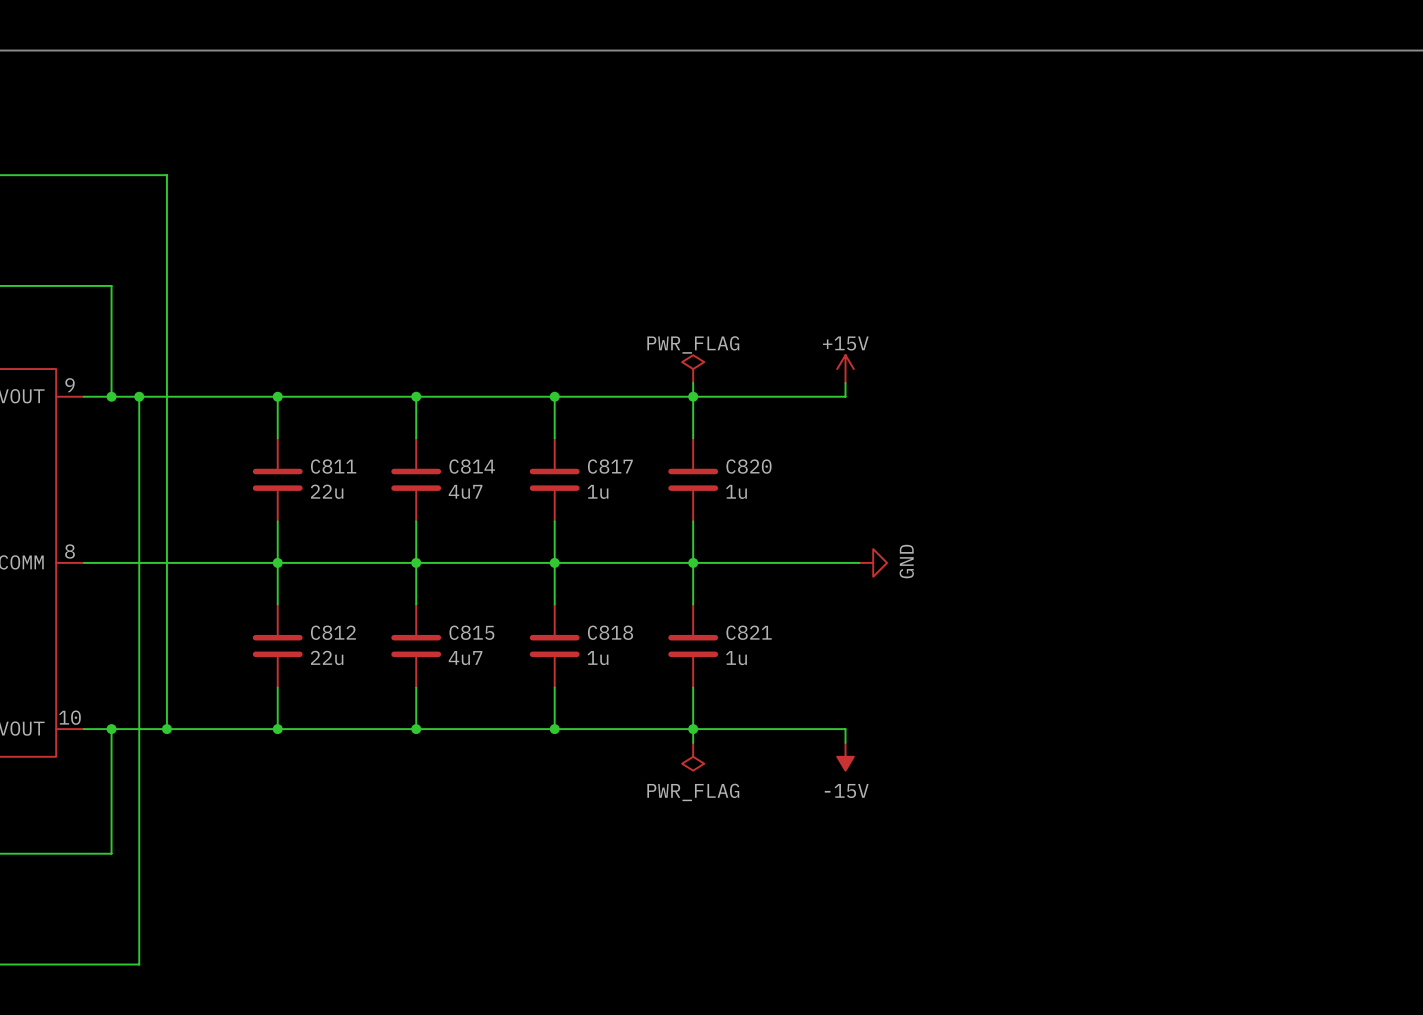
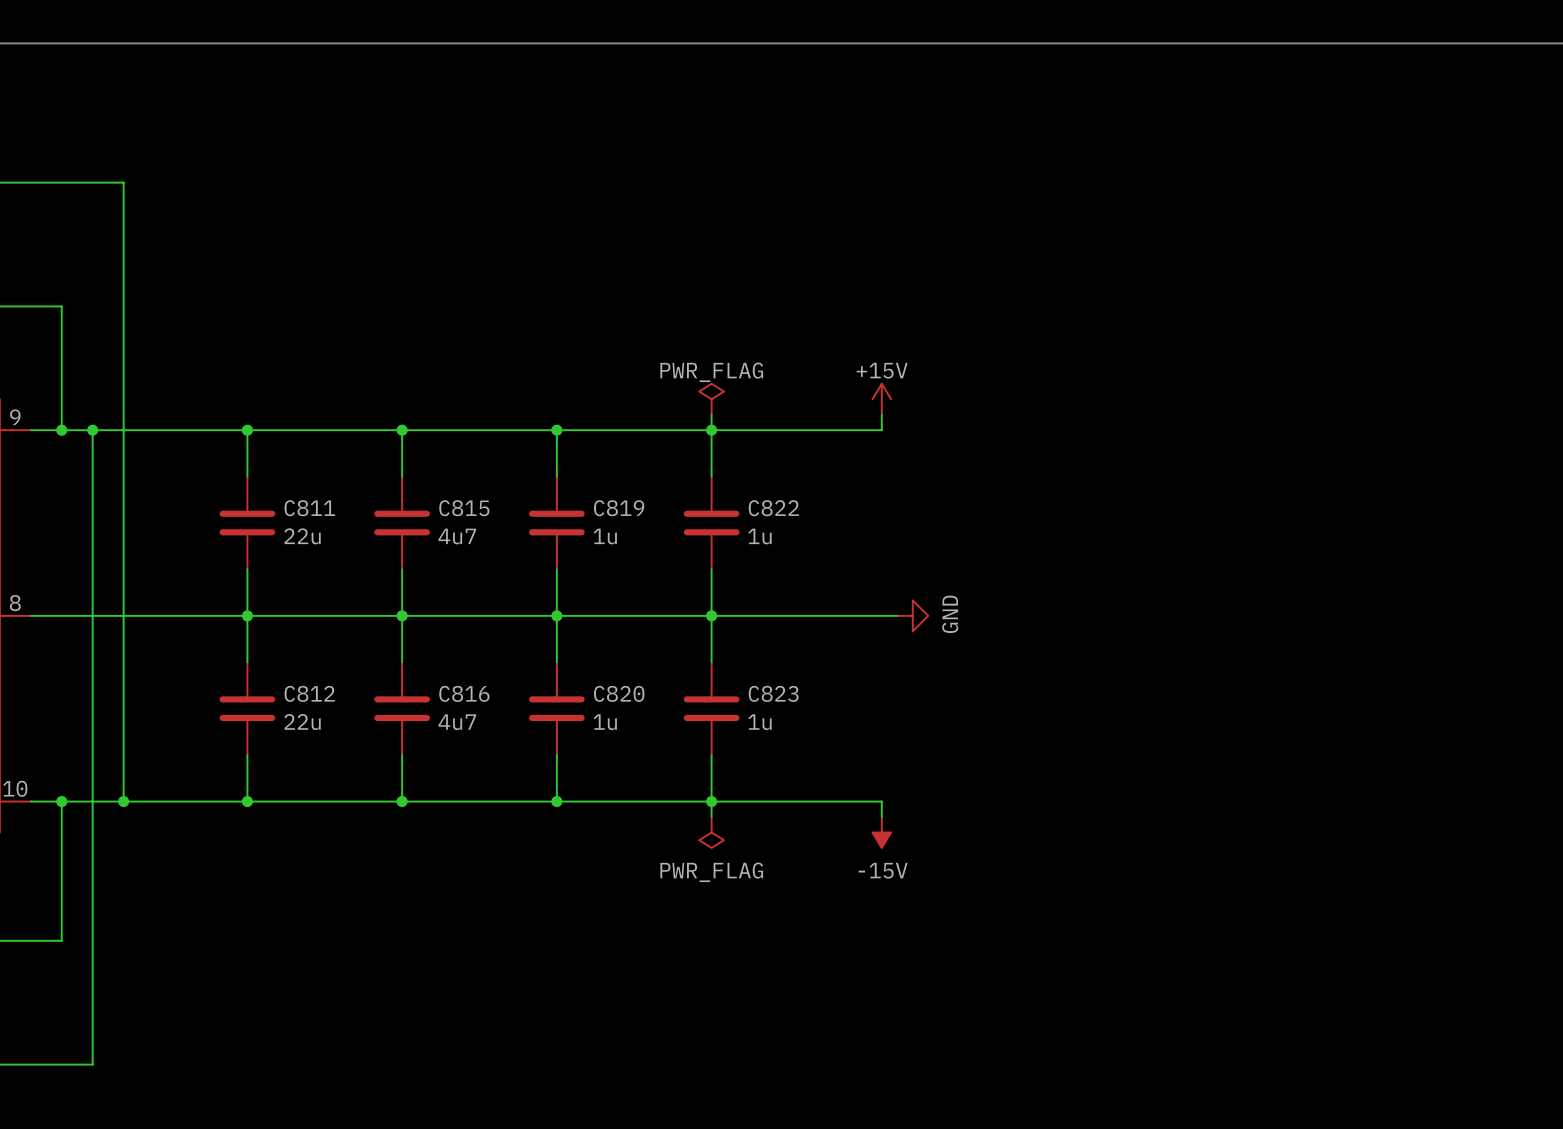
C814 name: C814 (472, 466) -> C815 (464, 508)
C817 name: C817 (610, 466) -> C819 (619, 508)
C820 name: C820 (748, 466) -> C822 (773, 508)
C815 name: C815 (471, 632) -> C816 (464, 693)
C818 name: C818 (610, 632) -> C820 (619, 693)
C821 name: C821 (749, 632) -> C823 (773, 693)

